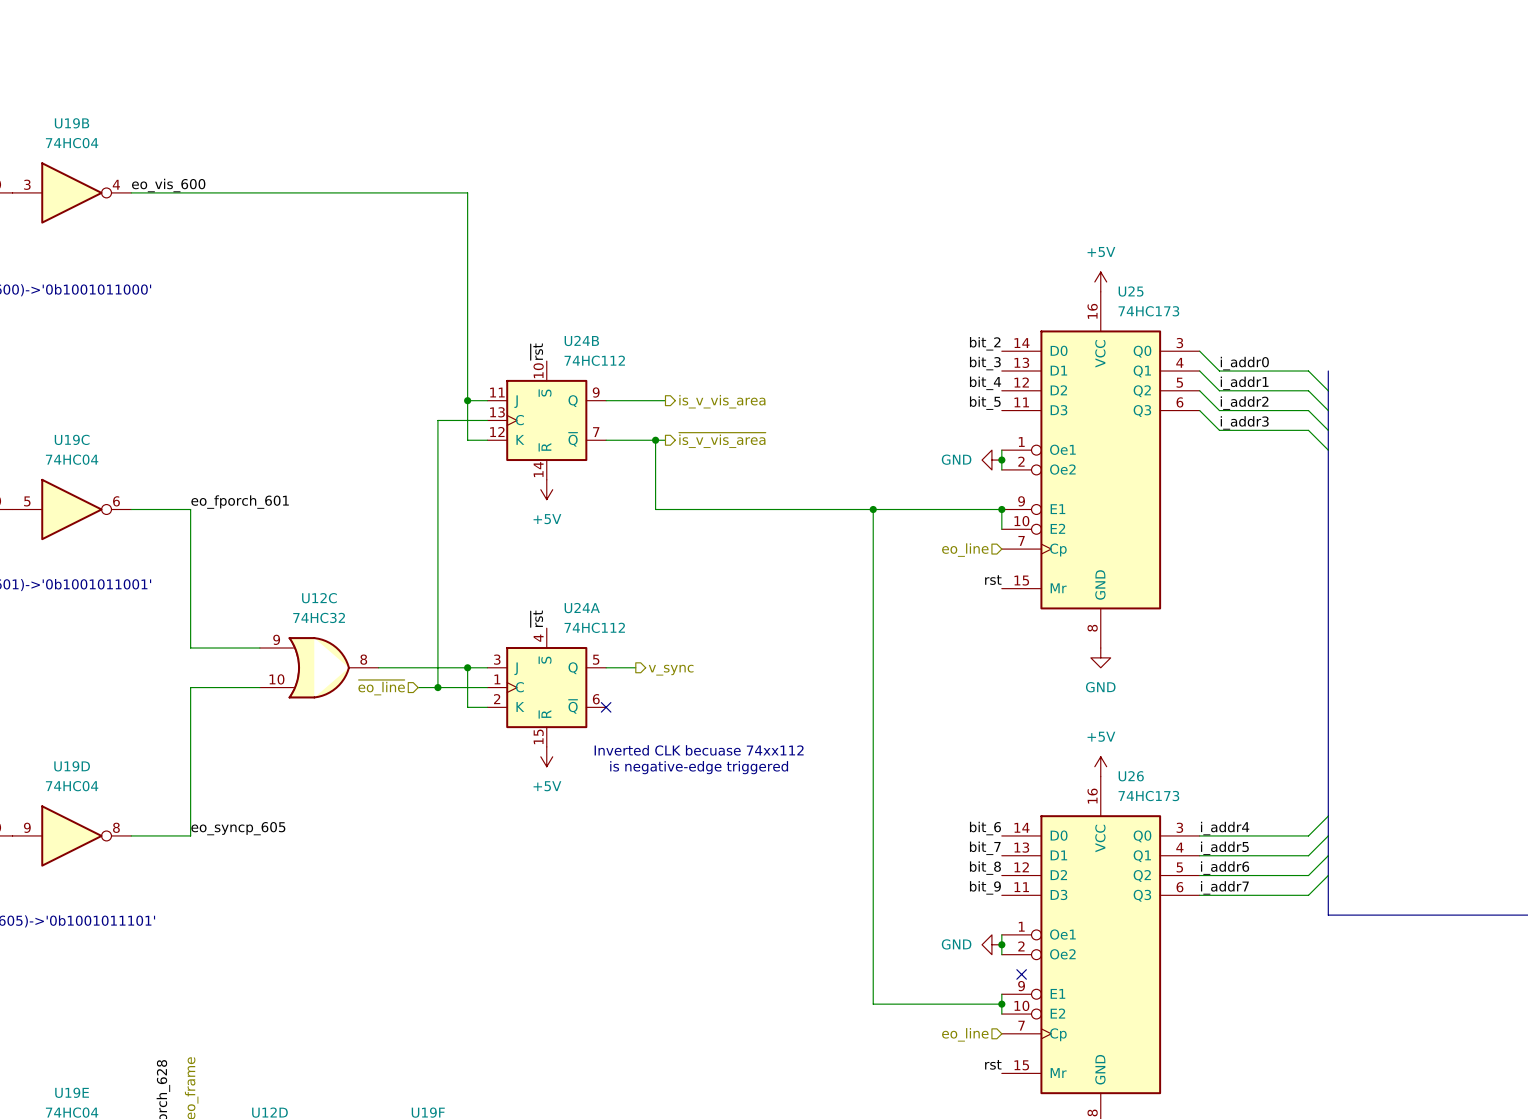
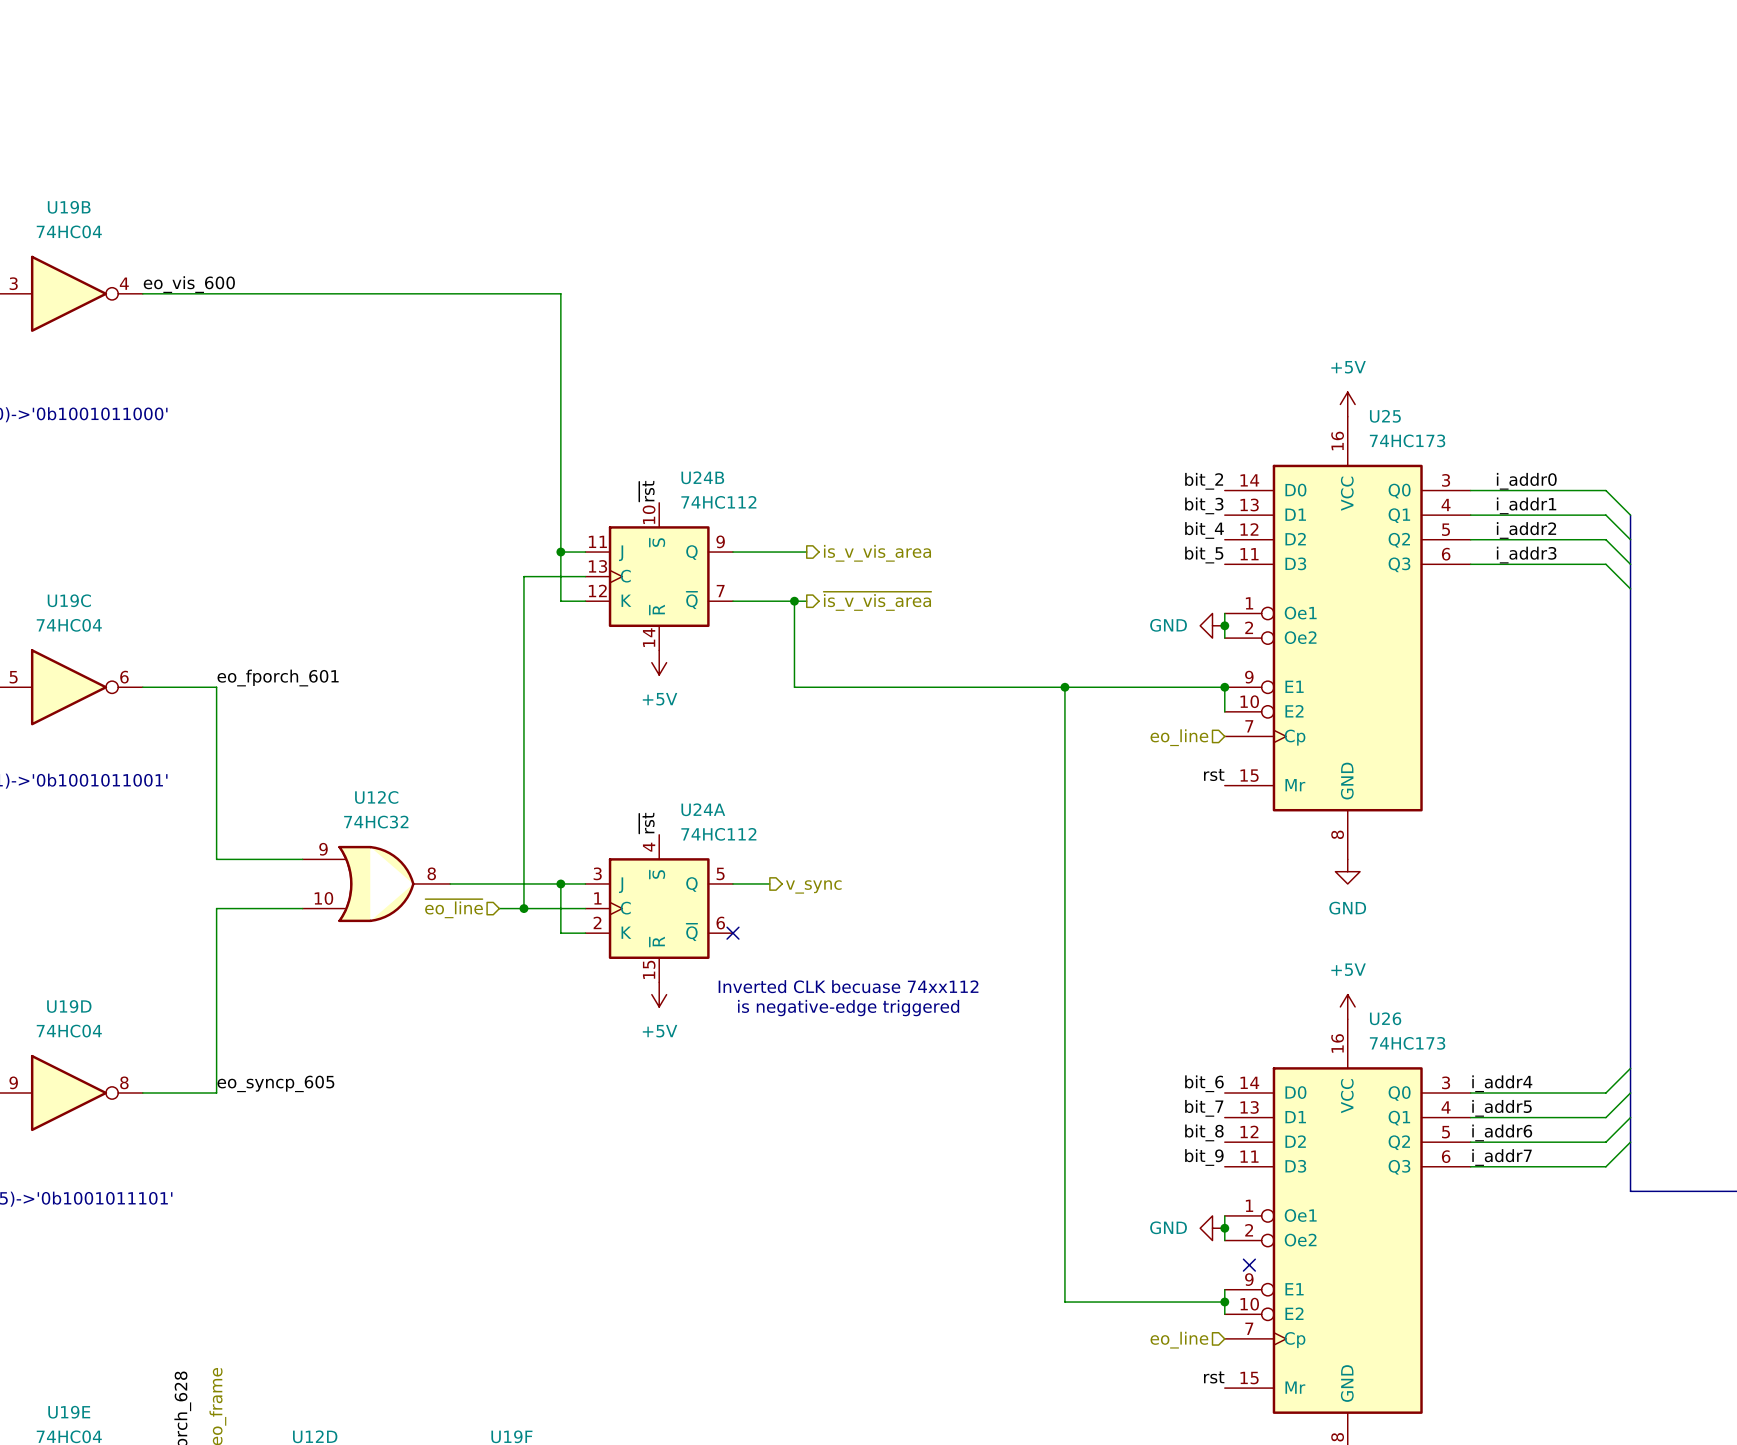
label: none -> i_addr0 (1526, 481)
wire: (1199, 351) (1219, 371) -> (1470, 490) (1605, 490) (1630, 515)
label: i_addr0 (1244, 363) -> i_addr1 (1526, 505)
wire: (1199, 371) (1219, 390) -> (1470, 515) (1495, 515)
label: i_addr1 (1244, 383) -> i_addr2 (1526, 530)
wire: (1199, 390) (1219, 410) -> (1470, 539) (1495, 539)
label: i_addr2 (1244, 403) -> i_addr3 (1526, 555)
wire: (1199, 410) (1219, 430) (1308, 430) (1328, 450) -> (1470, 564) (1495, 564)
label: i_addr3 (1244, 422) -> none

